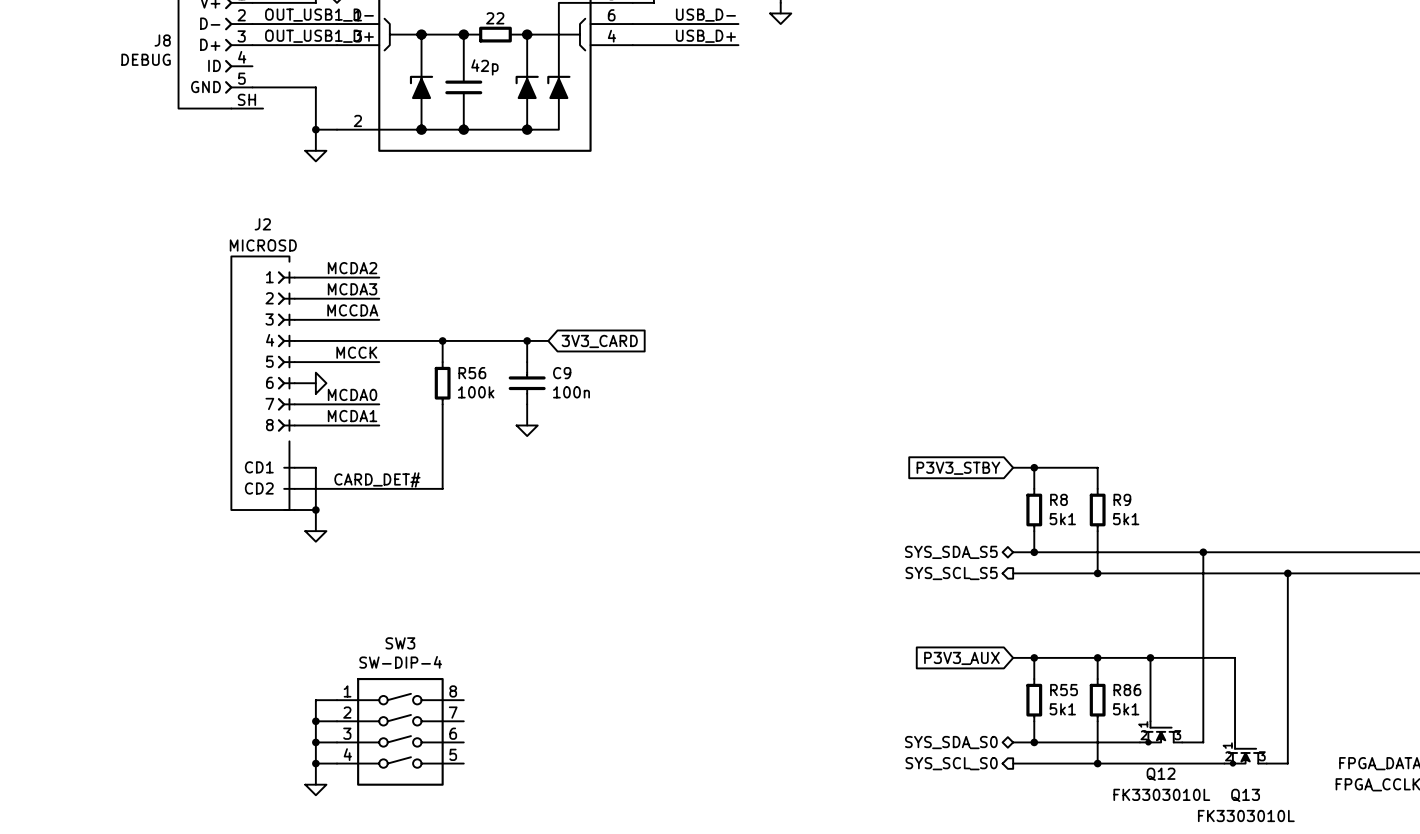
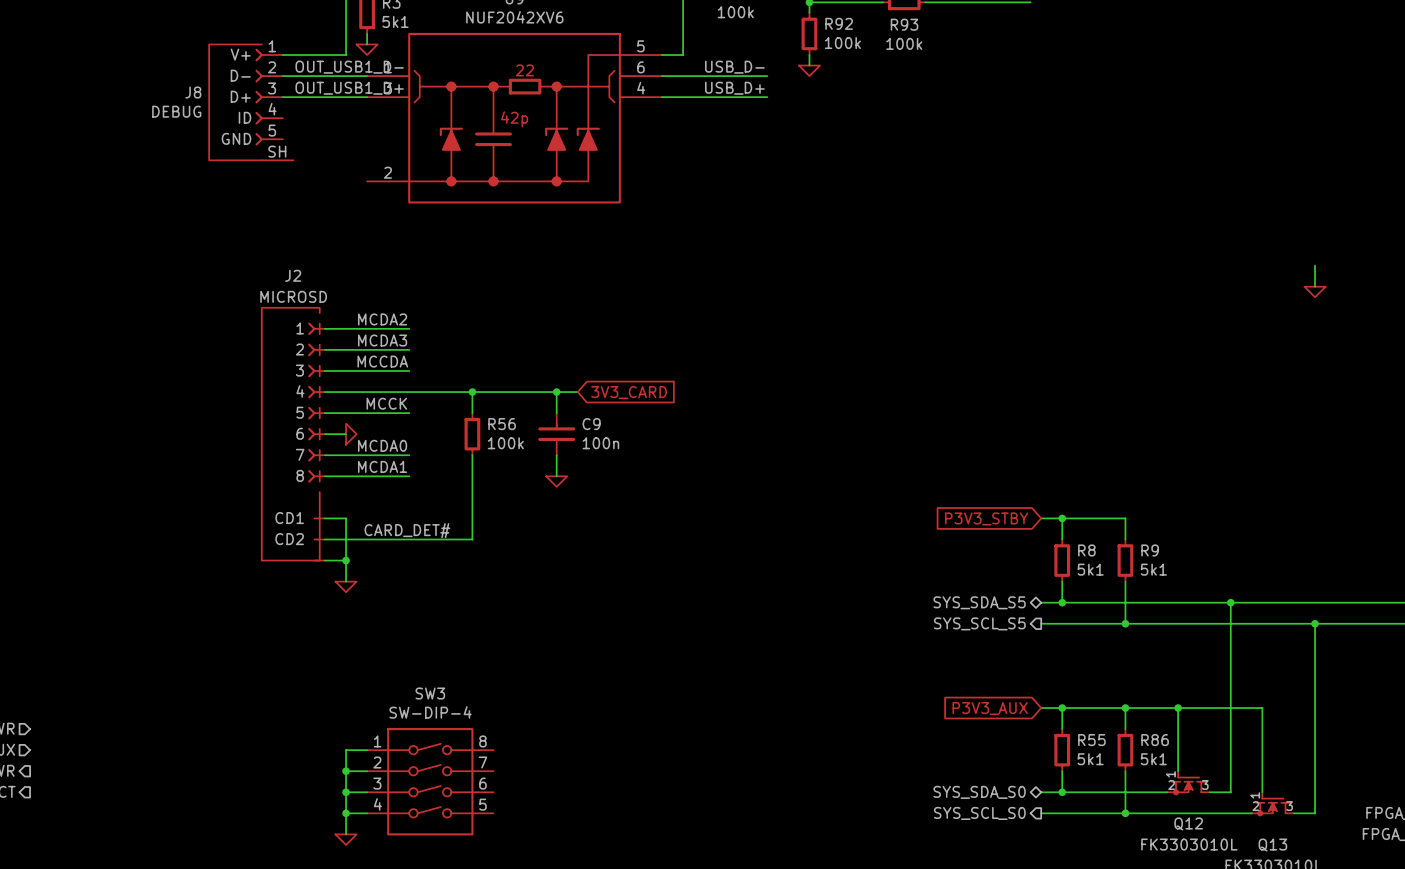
wire: (252, 87) (315, 87) (315, 150) -> none
wire: (315, 129) (337, 129) -> none
junction: (315, 129) -> none
power symbol: (315, 156) -> none
wire: none -> (1315, 265) (1315, 286)
power symbol: none -> (1315, 291)

